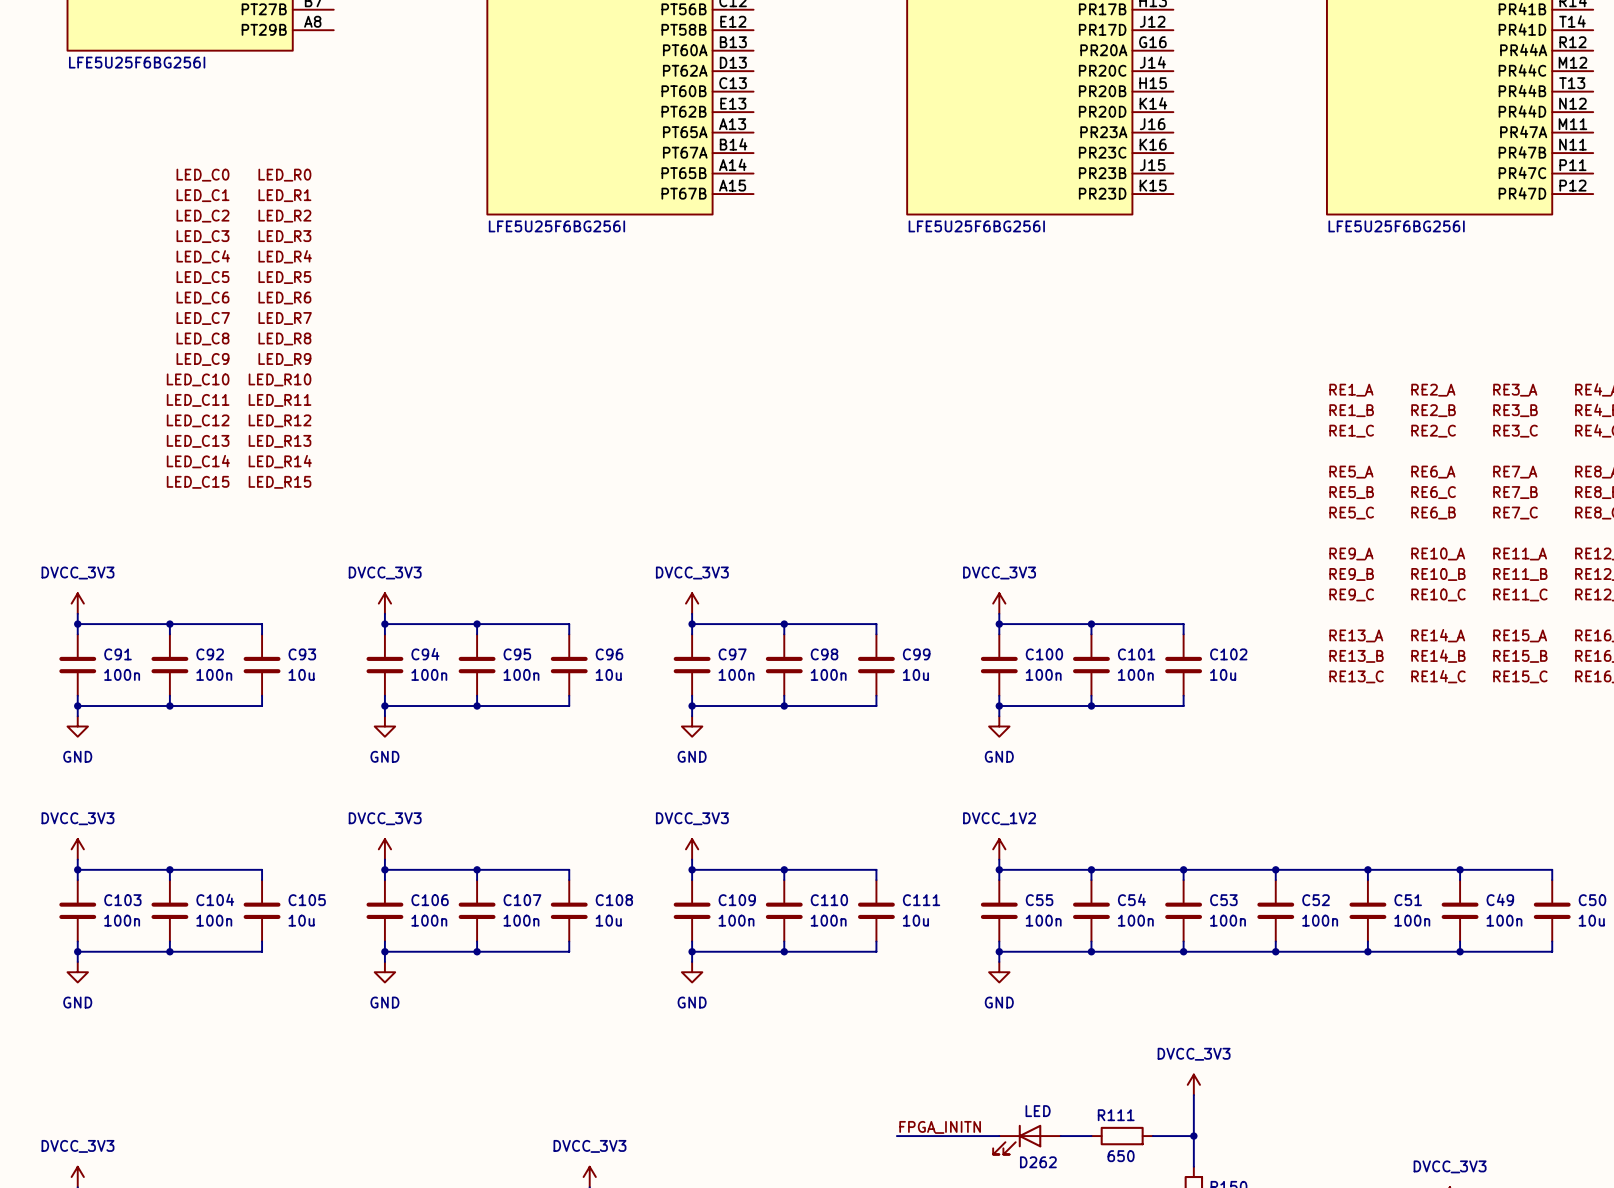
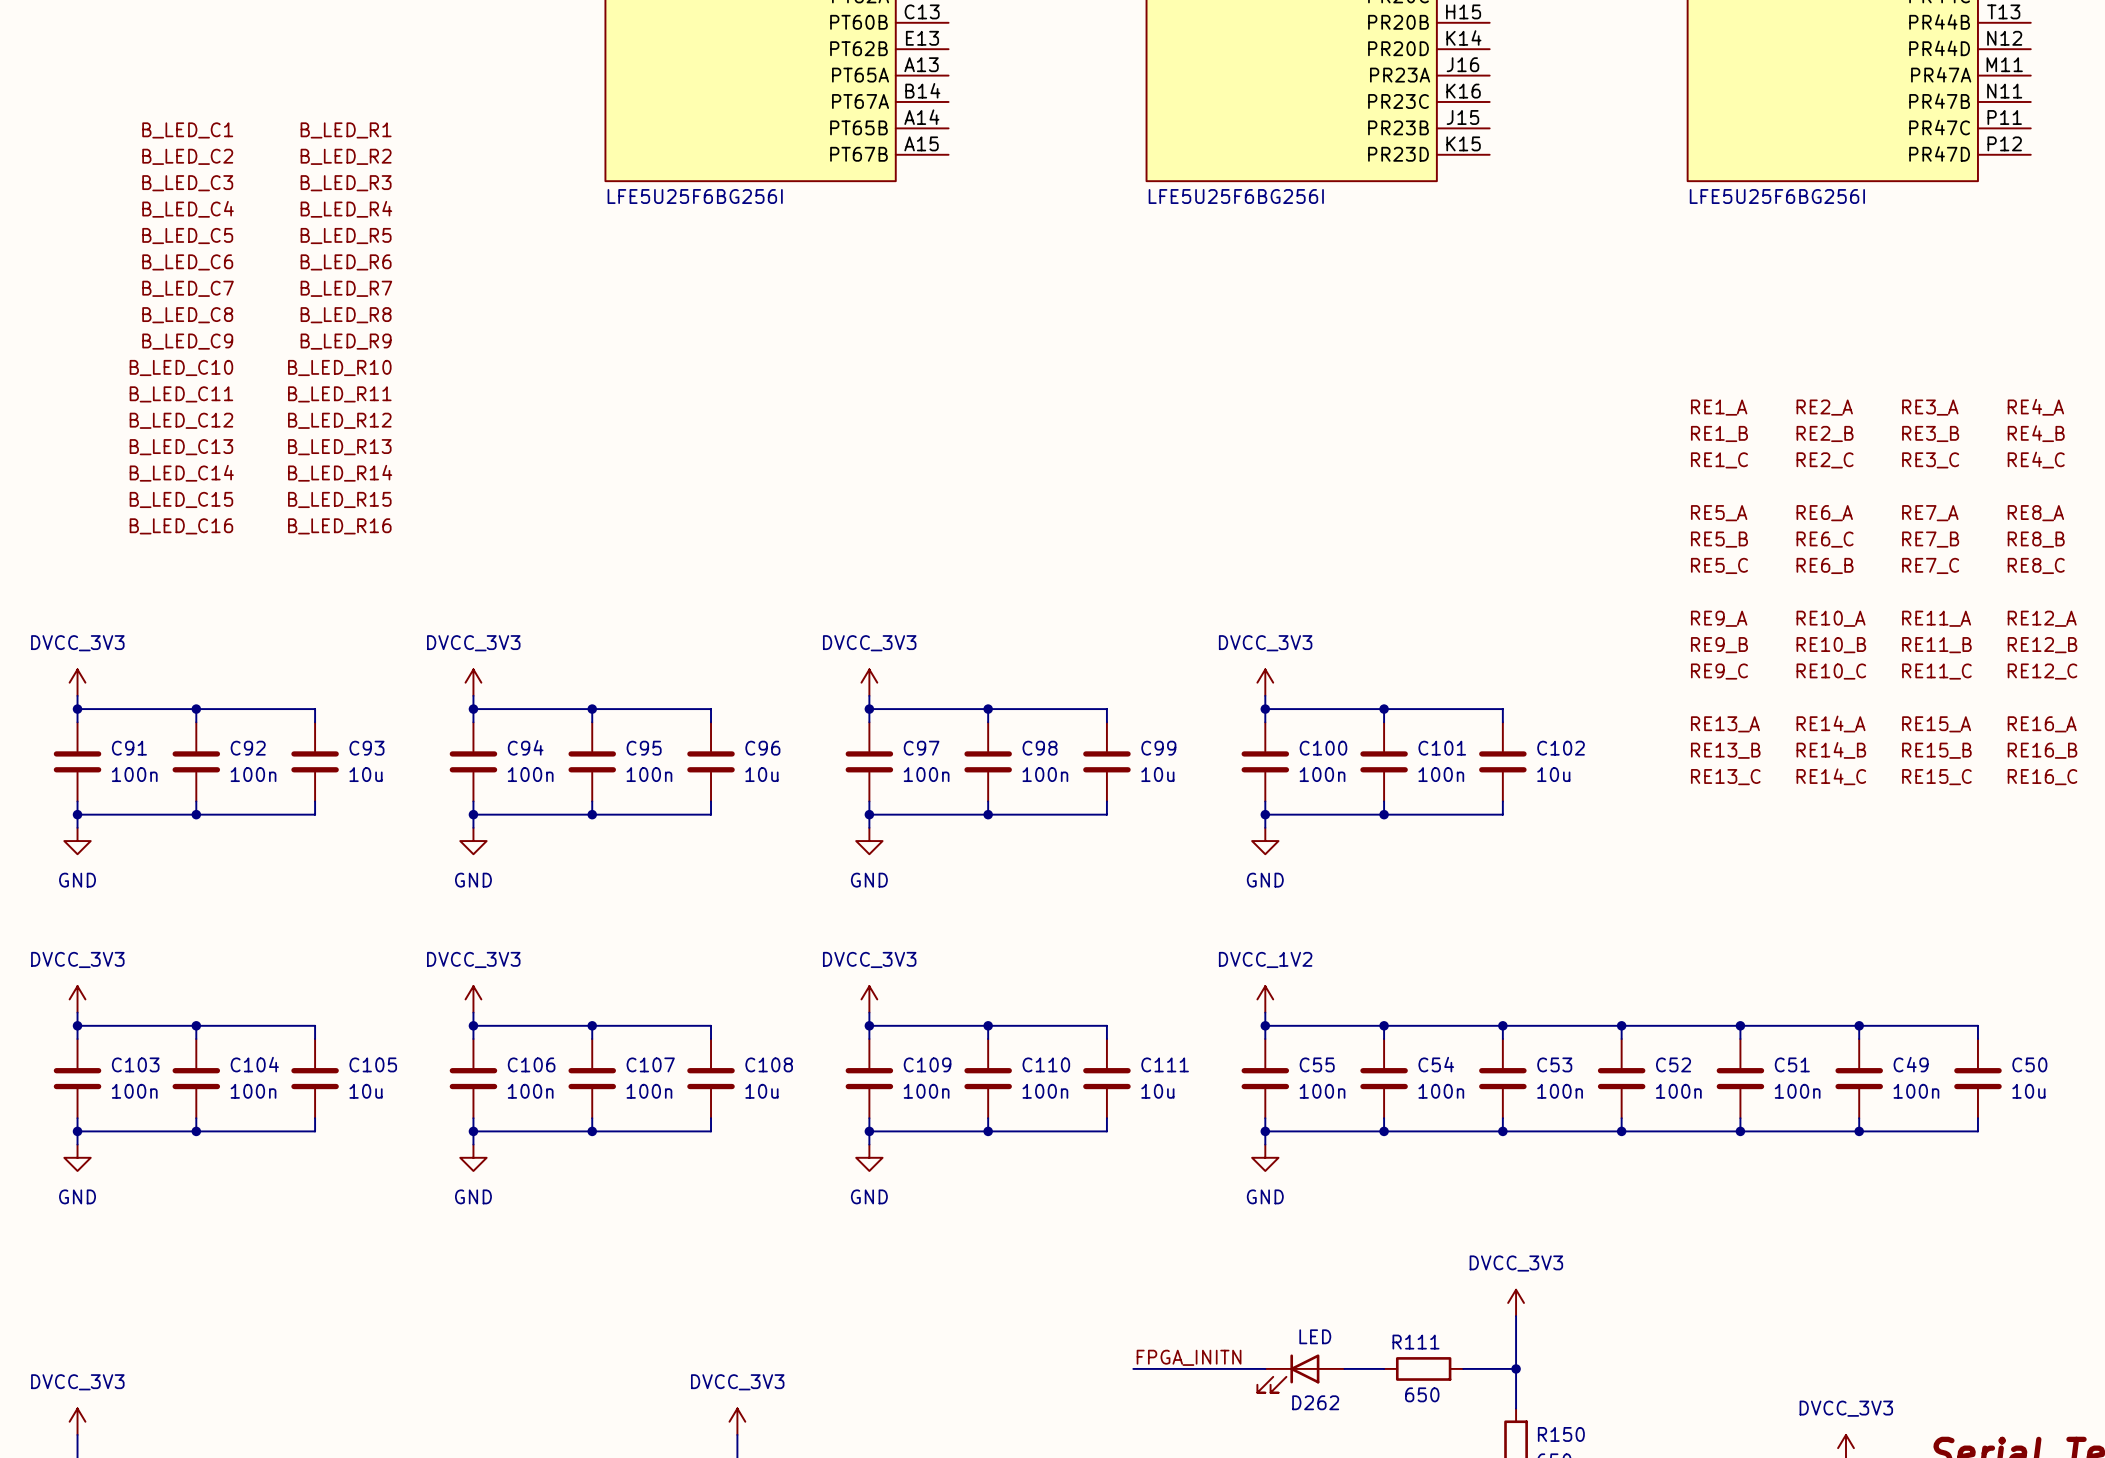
label: none -> B_LED_C1 (187, 130)
label: LED_C0 (202, 175) -> none
label: LED_R0 (284, 175) -> B_LED_R1 (346, 130)
label: none -> B_LED_C2 (187, 156)
label: LED_C1 (202, 195) -> none
label: LED_R1 (284, 195) -> B_LED_R2 (346, 156)
label: none -> B_LED_C3 (187, 183)
label: LED_C2 (202, 216) -> none
label: LED_R2 (284, 216) -> B_LED_R3 (346, 183)
label: none -> B_LED_C4 (188, 209)
label: LED_C3 (202, 236) -> none
label: LED_R3 (284, 236) -> B_LED_R4 (346, 209)
label: LED_C4 (203, 256) -> none
label: LED_R4 (285, 256) -> B_LED_R5 (346, 236)
label: none -> B_LED_C5 (187, 236)
label: none -> B_LED_C6 (187, 262)
label: LED_C5 (202, 277) -> none
label: LED_R5 (284, 277) -> B_LED_R6 (346, 262)
label: none -> B_LED_C7 (188, 288)
label: LED_C6 (202, 298) -> none
label: LED_R6 (284, 298) -> B_LED_R7 (346, 288)
label: none -> B_LED_C8 (187, 315)
label: LED_C7 (203, 318) -> none
label: LED_R7 (285, 318) -> B_LED_R8 (346, 315)
label: none -> B_LED_C9 (187, 341)
label: LED_C8 (202, 338) -> none
label: LED_R8 (284, 338) -> B_LED_R9 (346, 341)
label: none -> B_LED_C10 (181, 367)
label: LED_C9 (202, 359) -> none
label: LED_R9 (284, 359) -> B_LED_R10 (339, 367)
label: none -> B_LED_C11 (181, 394)
label: LED_C10 (198, 379) -> none
label: LED_R10 (280, 379) -> B_LED_R11 (339, 394)
label: none -> B_LED_C12 (181, 420)
label: LED_C11 (198, 400) -> none
label: LED_R11 (280, 400) -> B_LED_R12 (339, 420)
label: none -> B_LED_C13 (181, 447)
label: LED_C12 (198, 420) -> none
label: LED_R12 (280, 420) -> B_LED_R13 (339, 447)
label: none -> B_LED_C14 (181, 473)
label: LED_C13 (198, 441) -> none
label: LED_R13 (280, 441) -> B_LED_R14 (340, 473)
label: none -> B_LED_C15 (181, 499)
label: LED_C14 (198, 461) -> none
label: LED_R14 (280, 461) -> B_LED_R15 (339, 499)
label: none -> B_LED_C16 (181, 526)
label: LED_C15 (198, 482) -> none
label: LED_R15 (280, 482) -> B_LED_R16 (339, 526)

